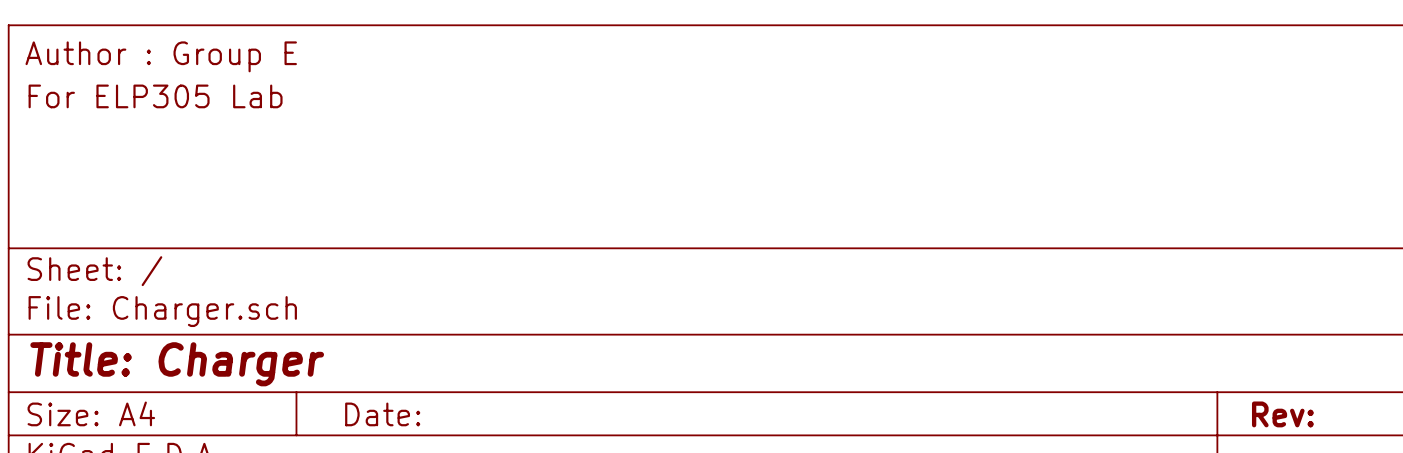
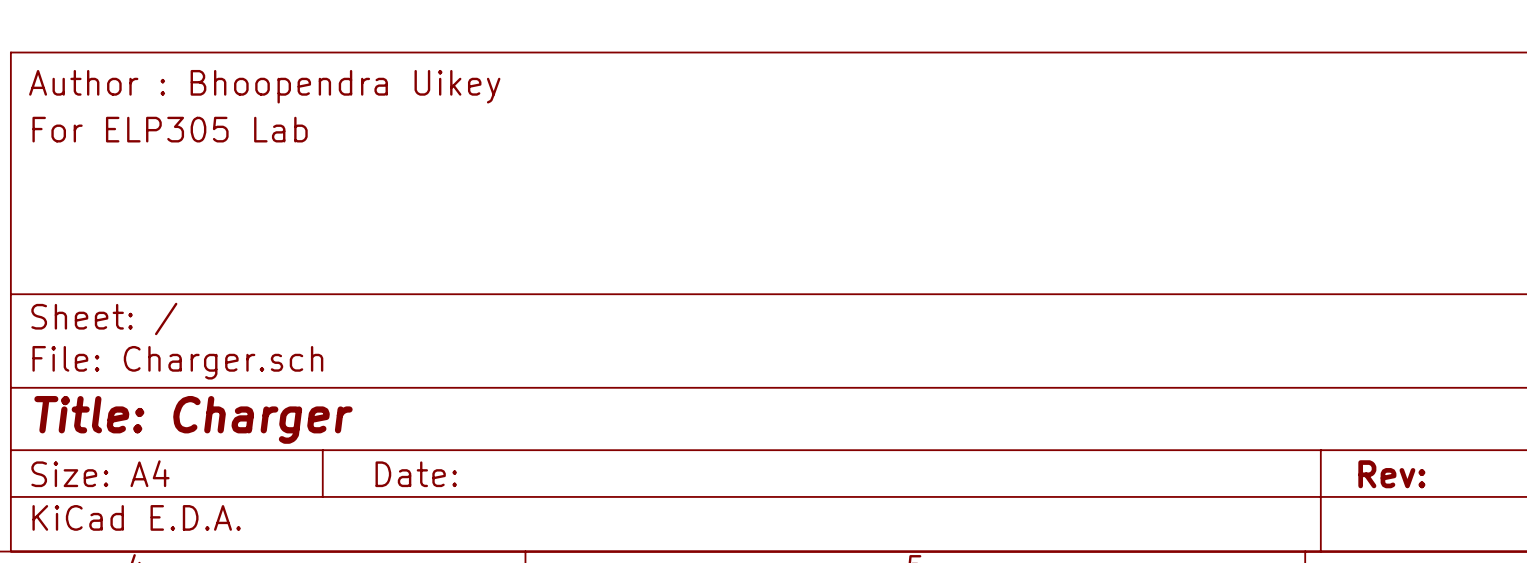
title block: Author : Group E (161, 56) -> Author : Bhoopendra Uikey (264, 86)

